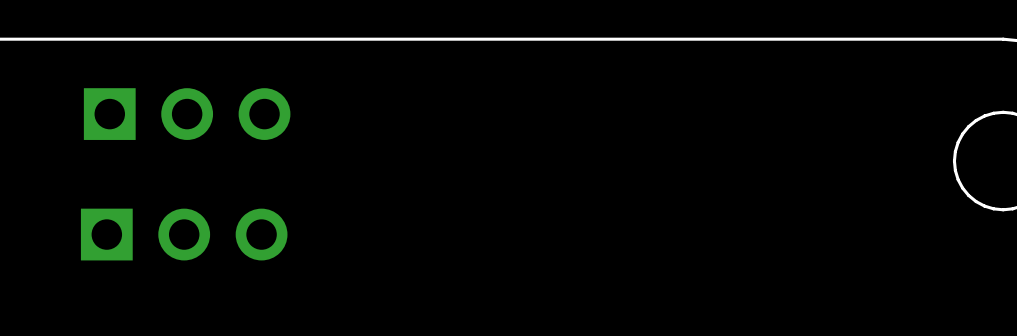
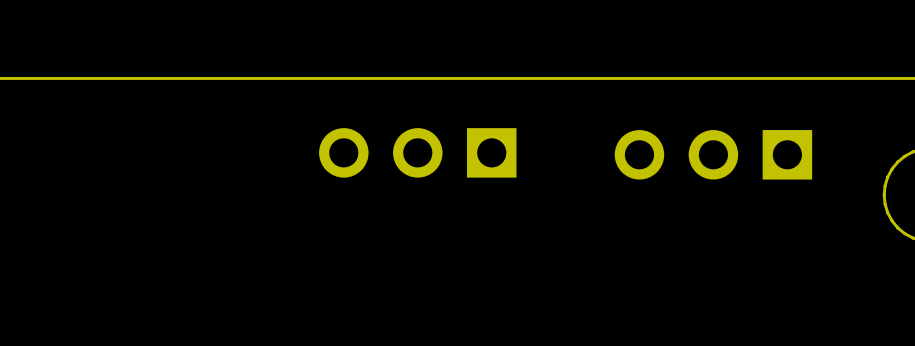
part: (187, 114) -> none
part: none -> (417, 152)
part: none -> (713, 154)
part: (184, 234) -> none

